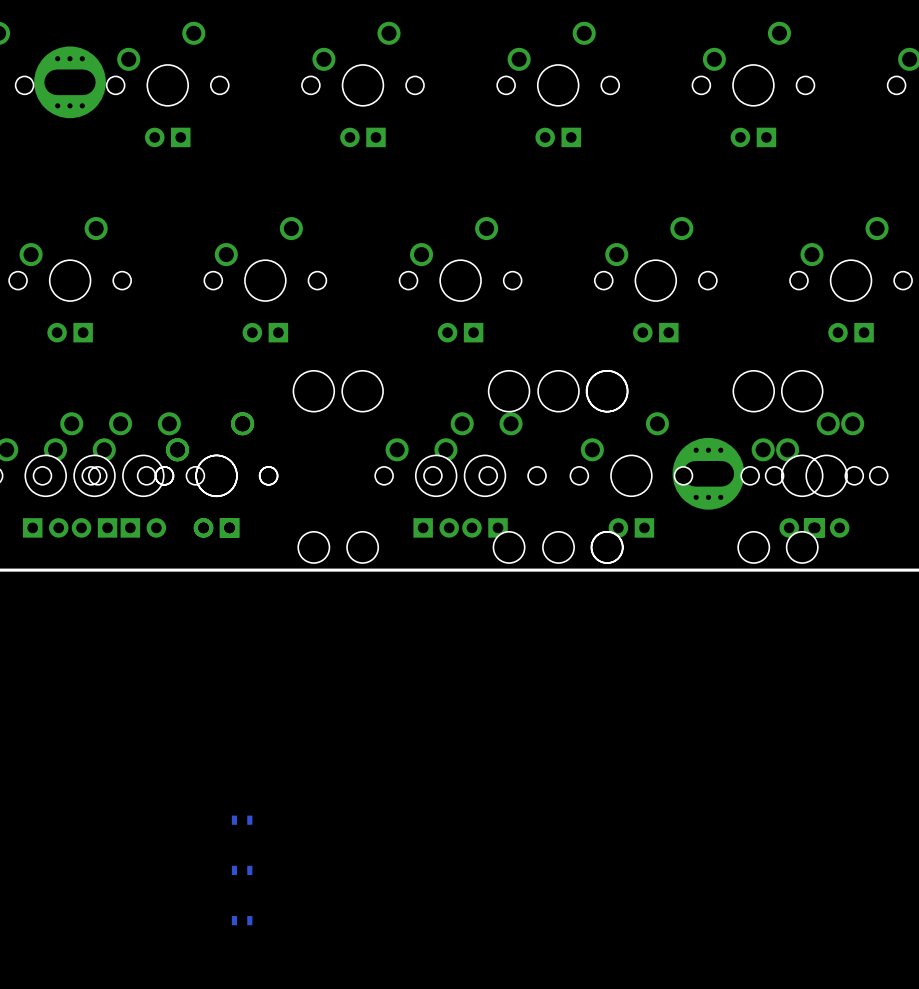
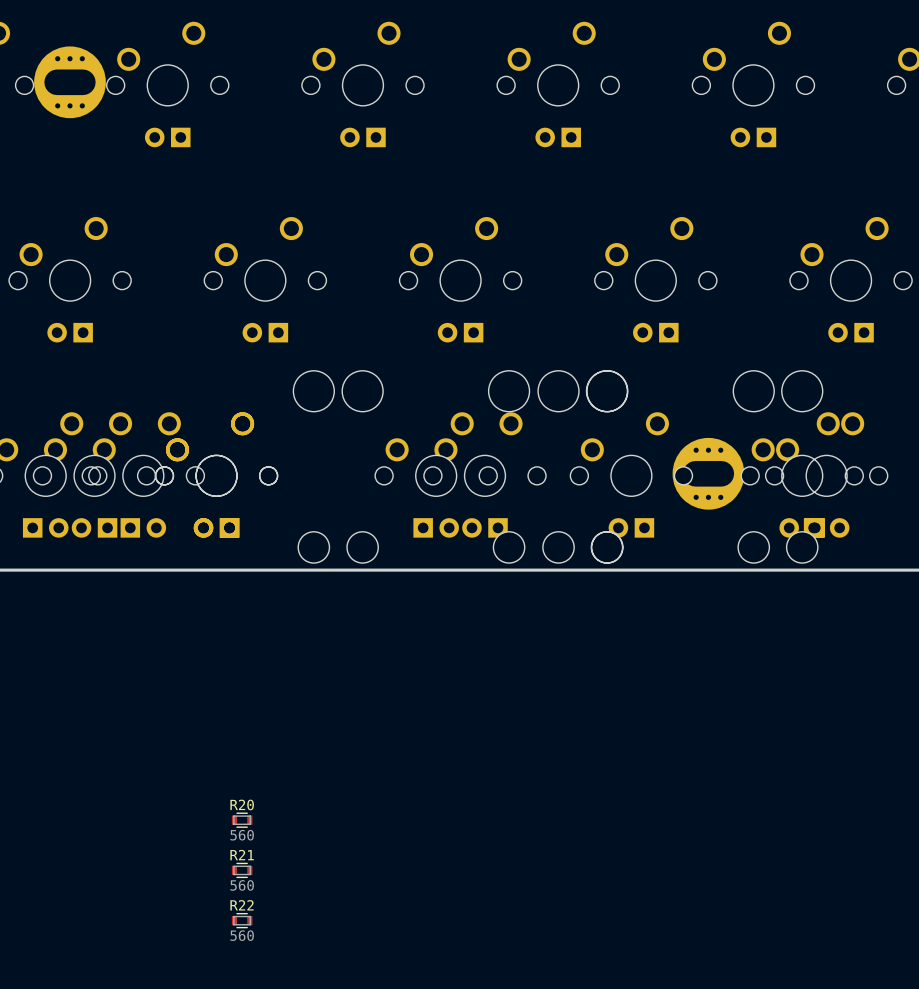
R20 side: bottom (242, 820) -> top (242, 820)
R21 side: bottom (242, 870) -> top (242, 870)
R22 side: bottom (242, 920) -> top (242, 920)

